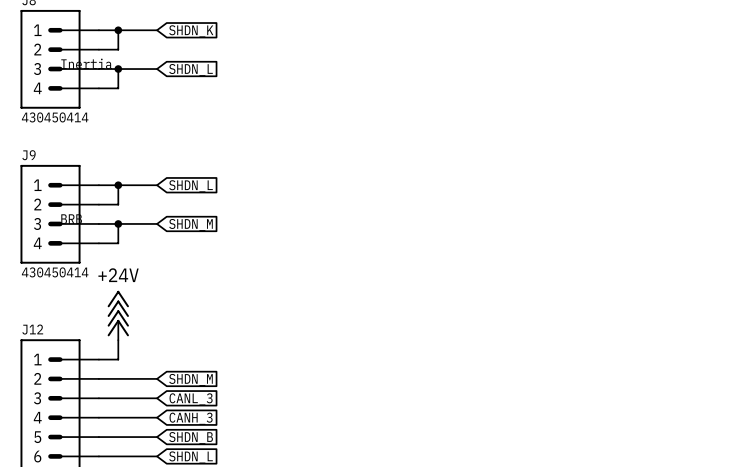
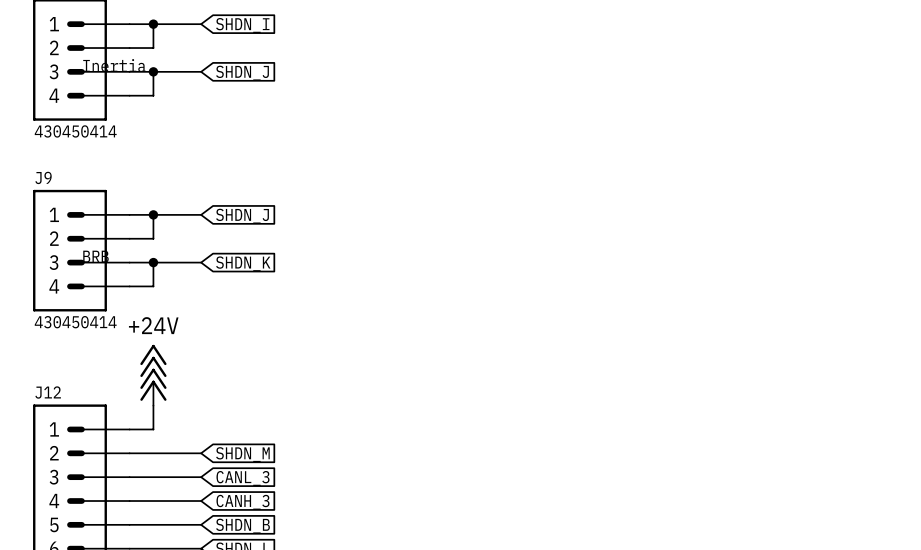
global label: SHDN_K (191, 31) -> SHDN_I (242, 25)
global label: SHDN_L (191, 70) -> SHDN_J (242, 73)
global label: SHDN_L (191, 186) -> SHDN_J (242, 216)
global label: SHDN_M (191, 225) -> SHDN_K (243, 263)

